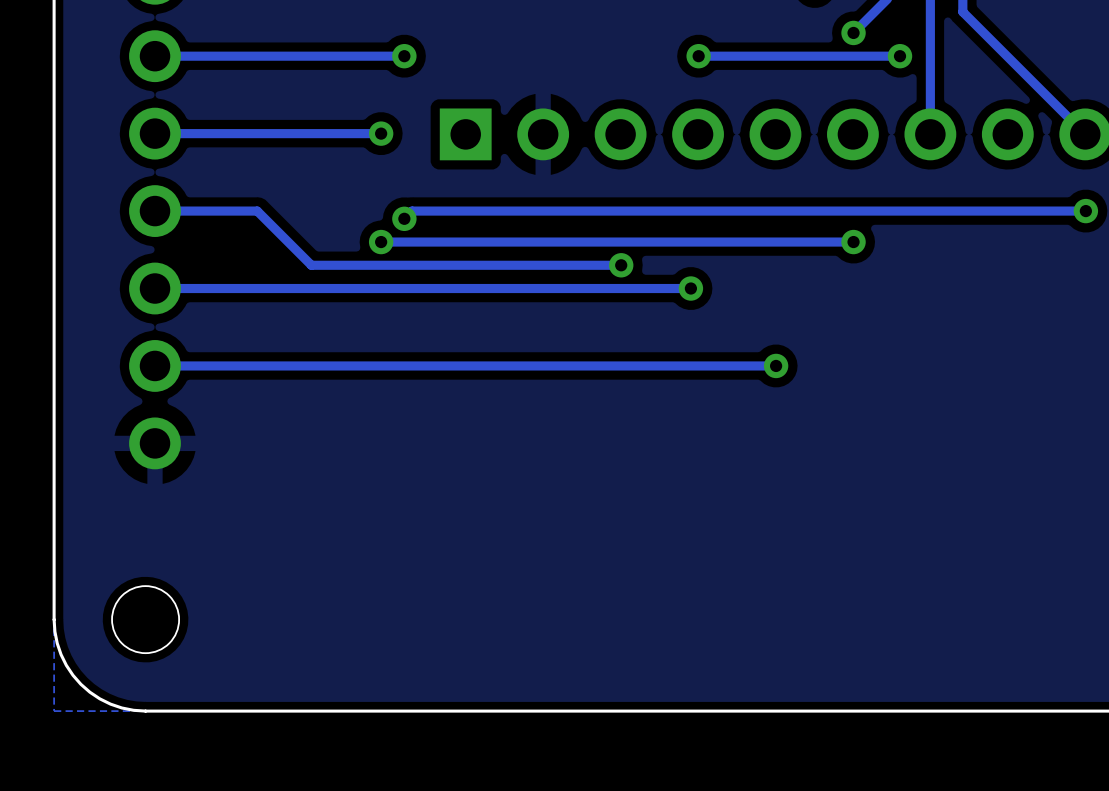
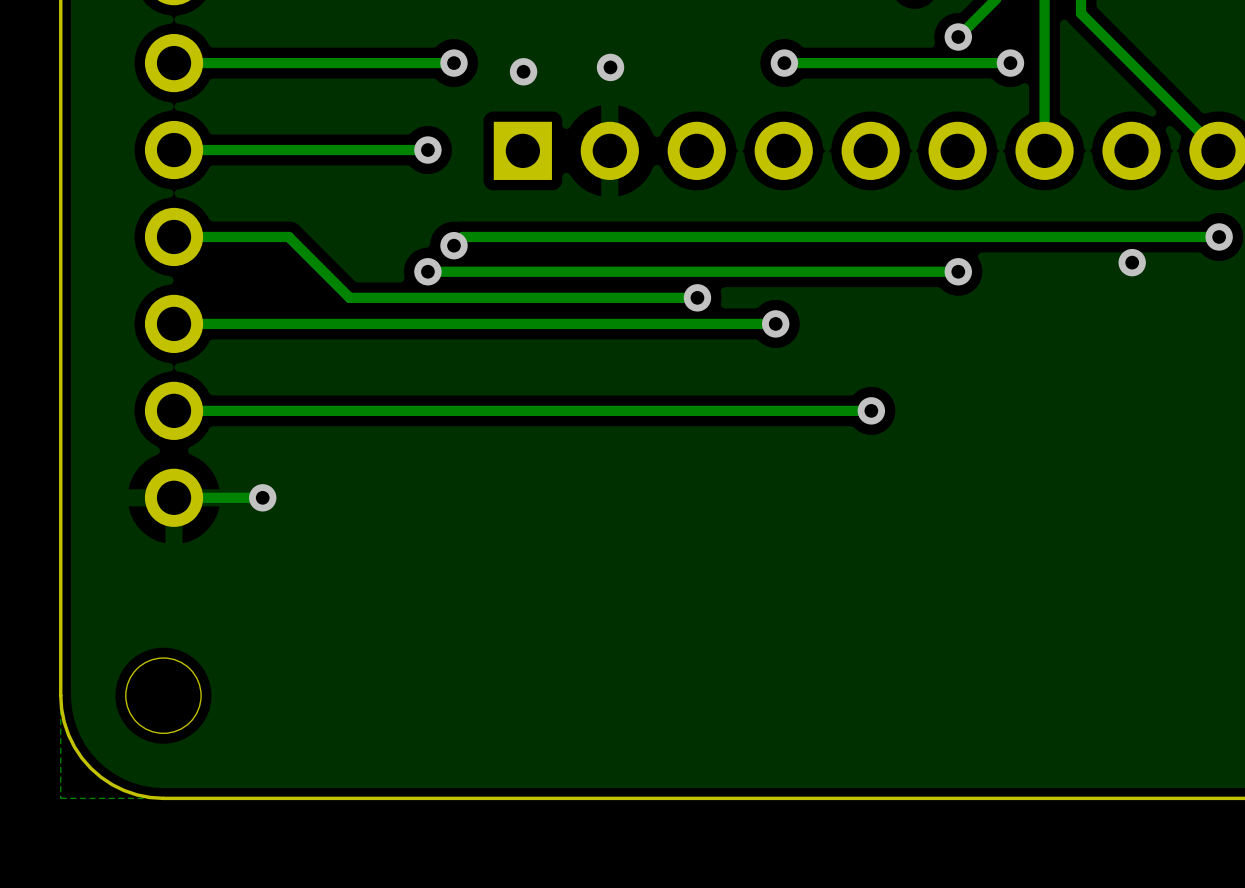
via: none -> (610, 67)
via: none -> (523, 71)
via: none -> (1132, 262)
track: none -> (262, 497) (174, 497)
via: none -> (262, 497)

